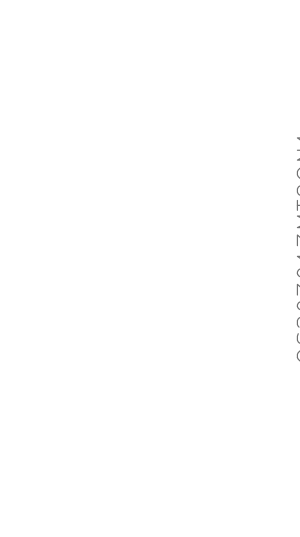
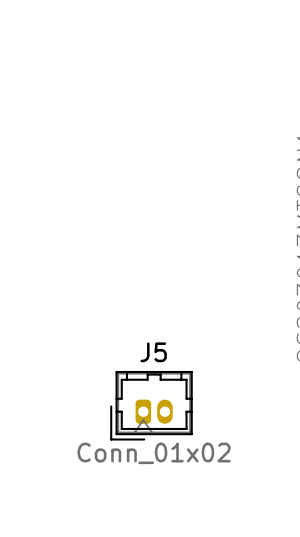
J5: none -> Conn_01x02 (151, 405)

